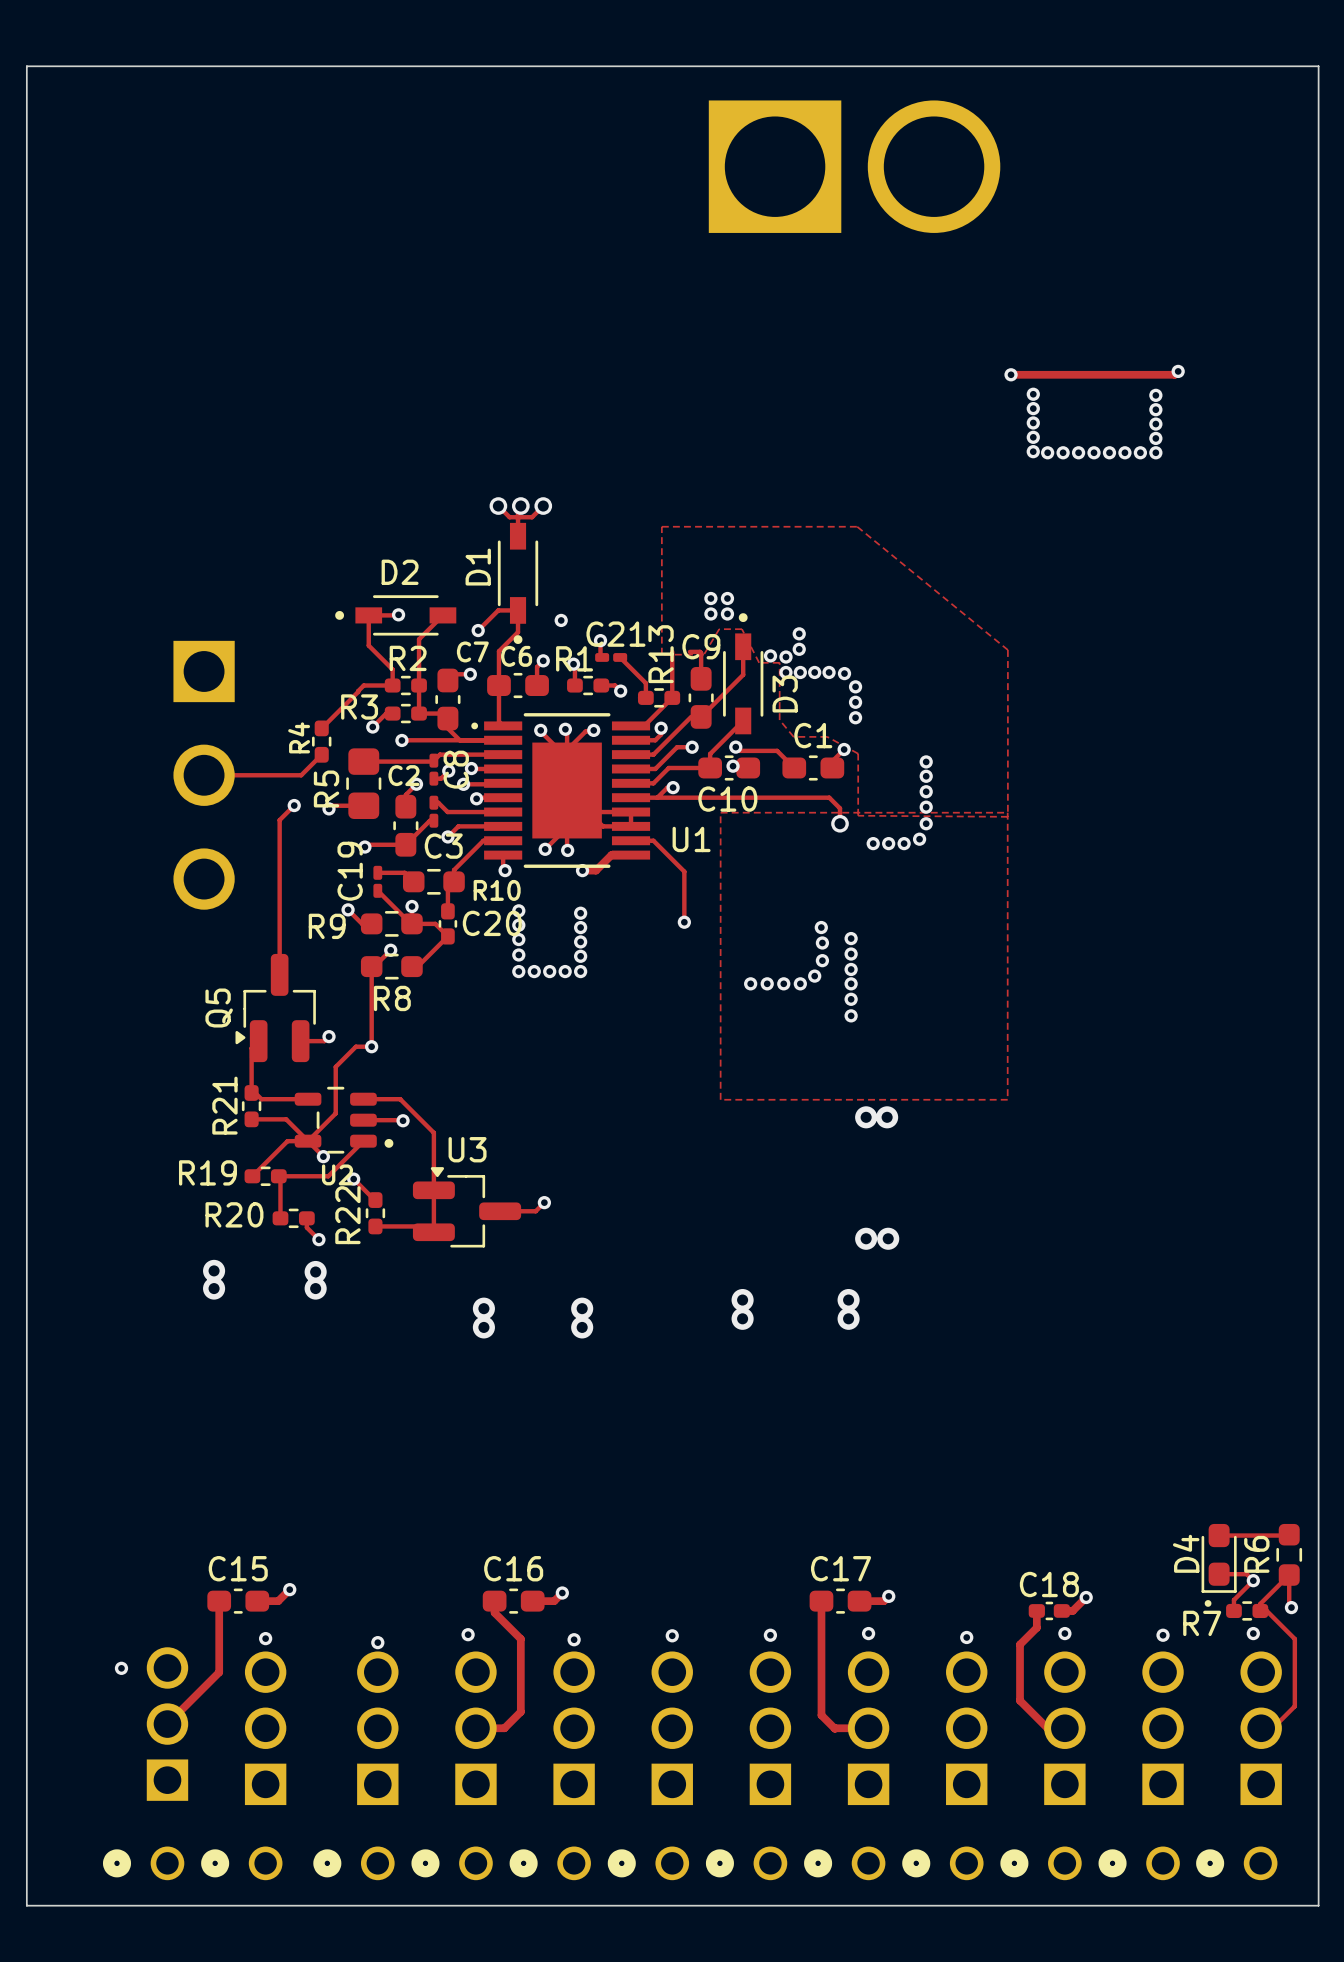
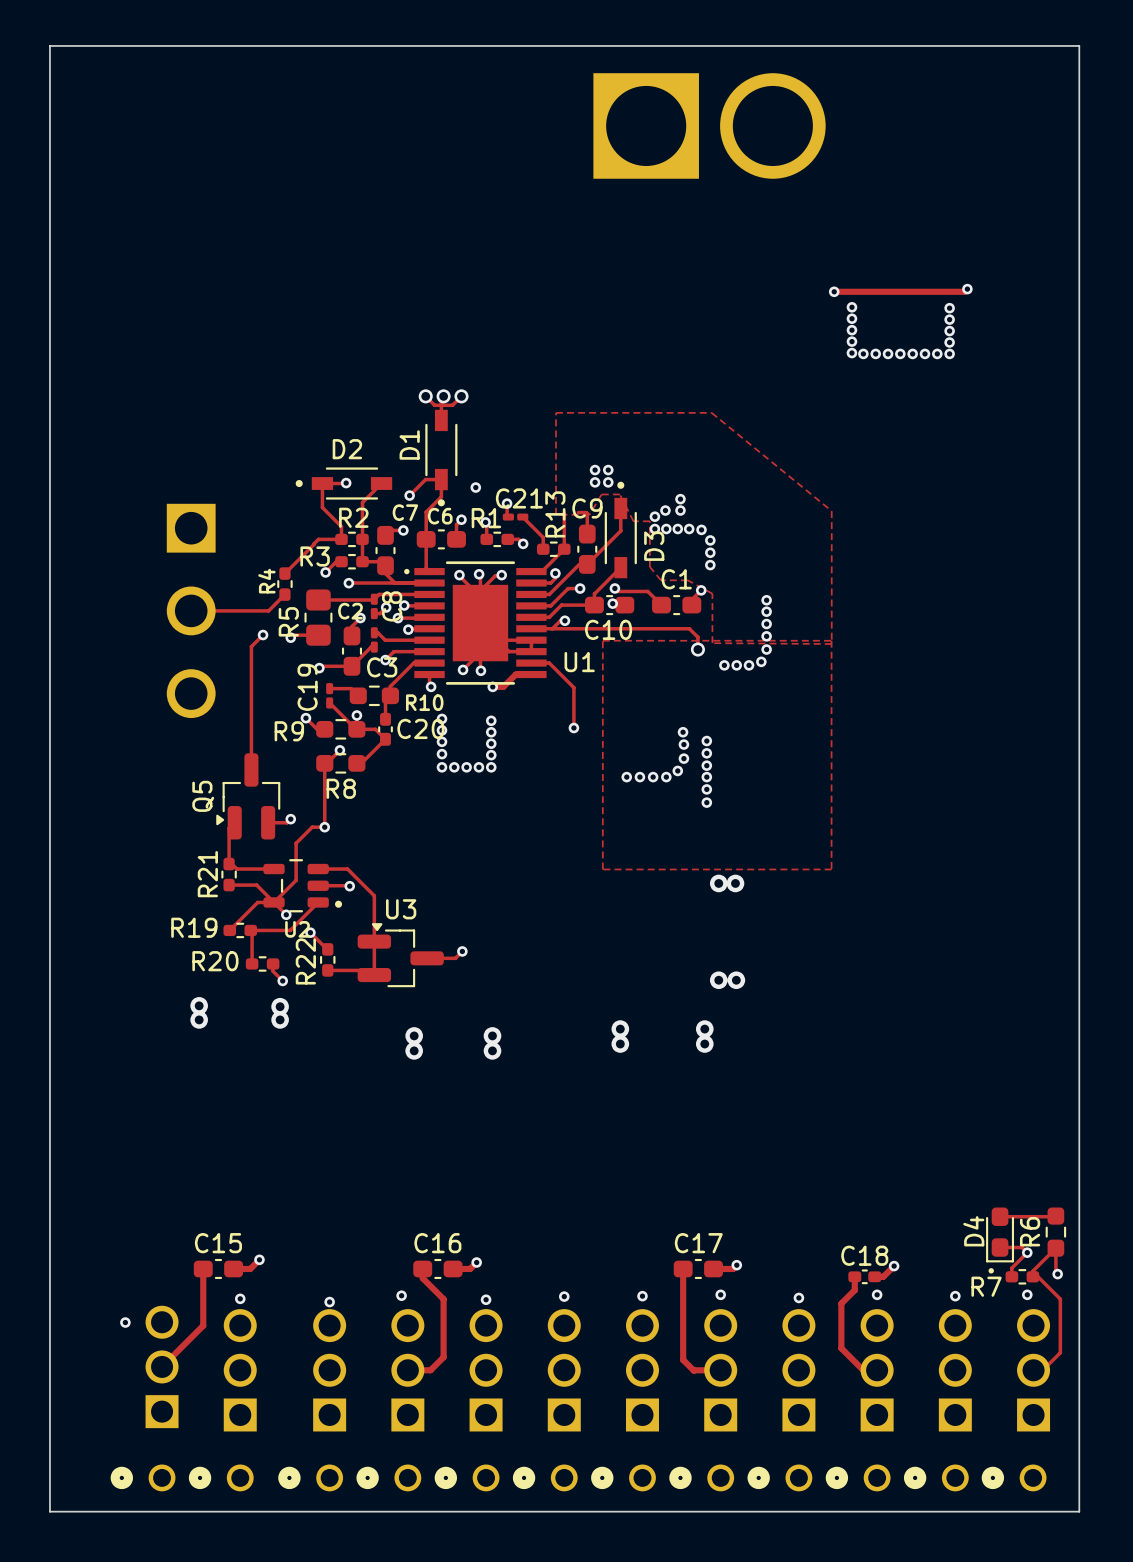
via: (799, 633) -> none
via: none -> (680, 499)
via: none -> (680, 510)
via: (770, 655) -> none

